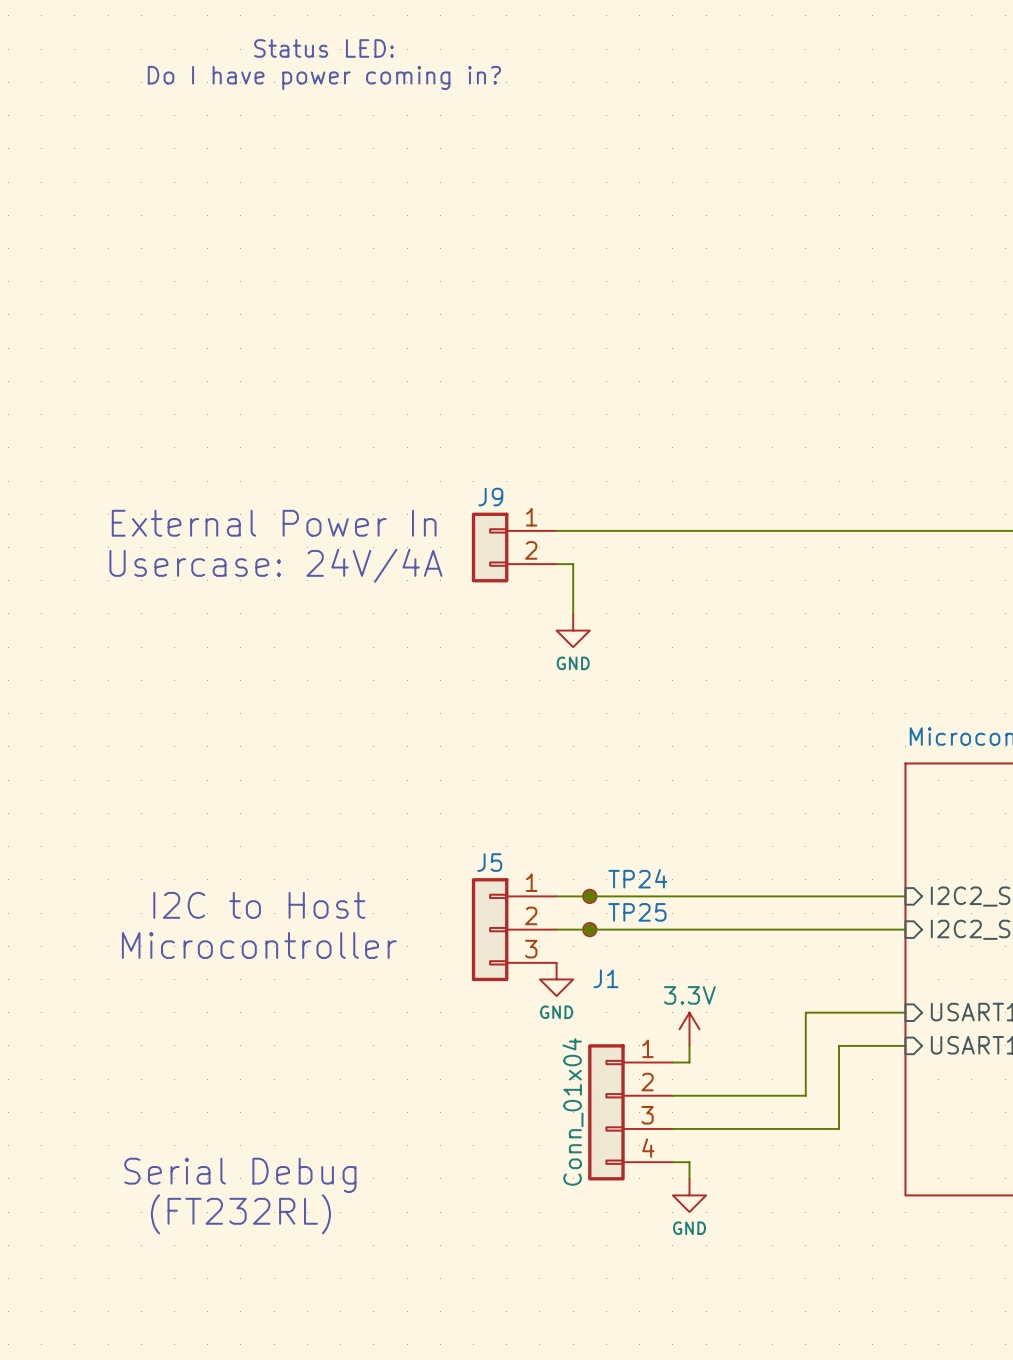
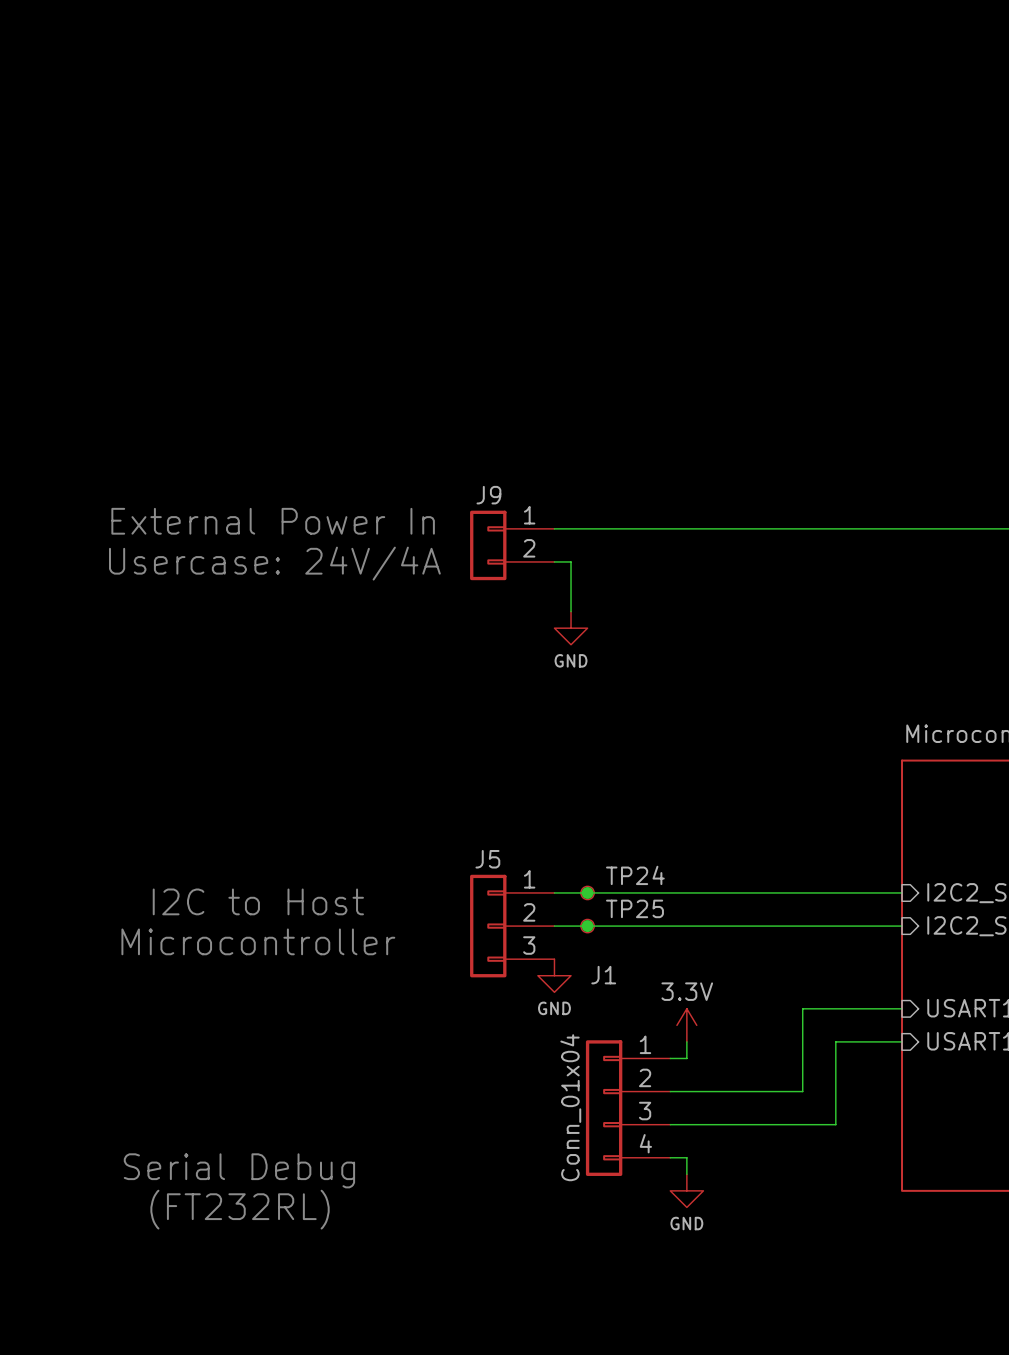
text: Status LED: (324, 48) -> none
text: Do I have power coming in? (324, 77) -> none

